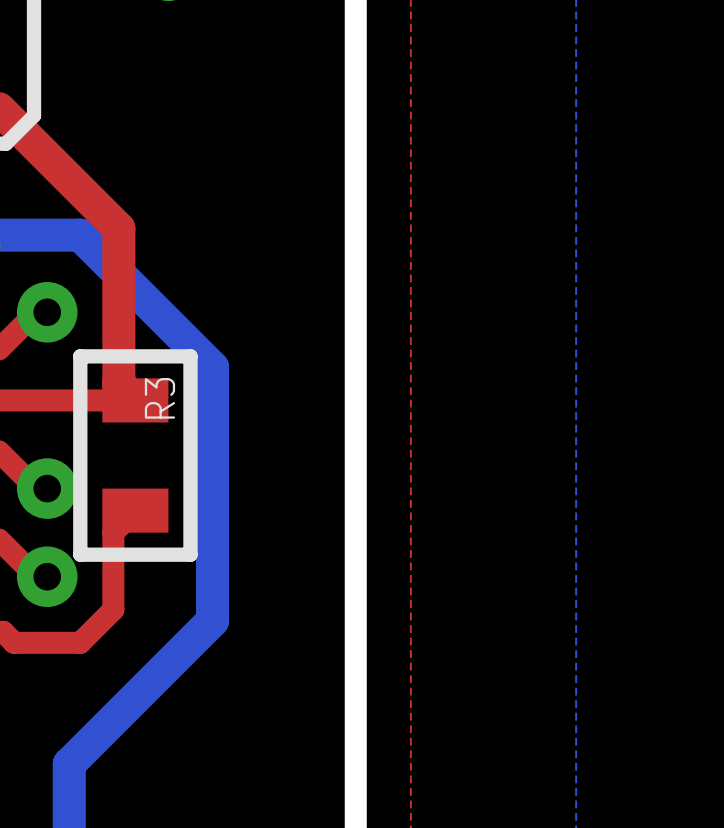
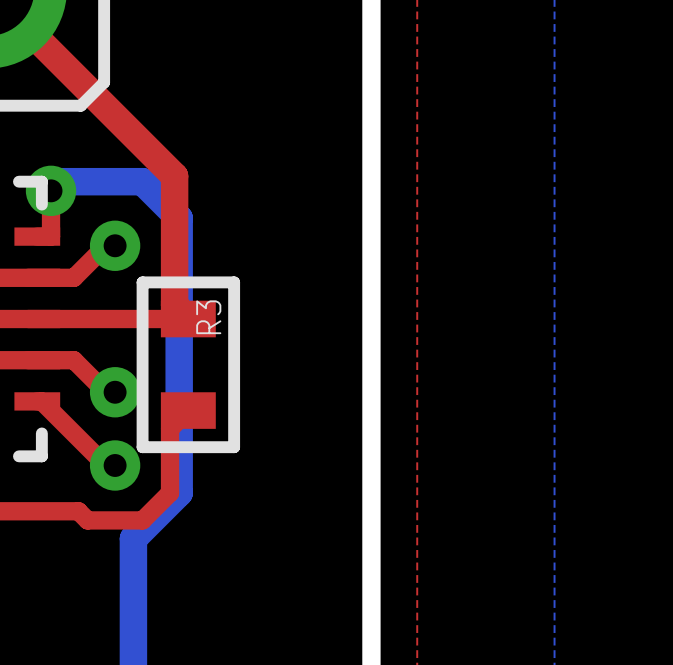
bottom track: (124, 279) (212, 367) (212, 620) (69, 764) -> (179, 218) (179, 492) (133, 538) (133, 621)

